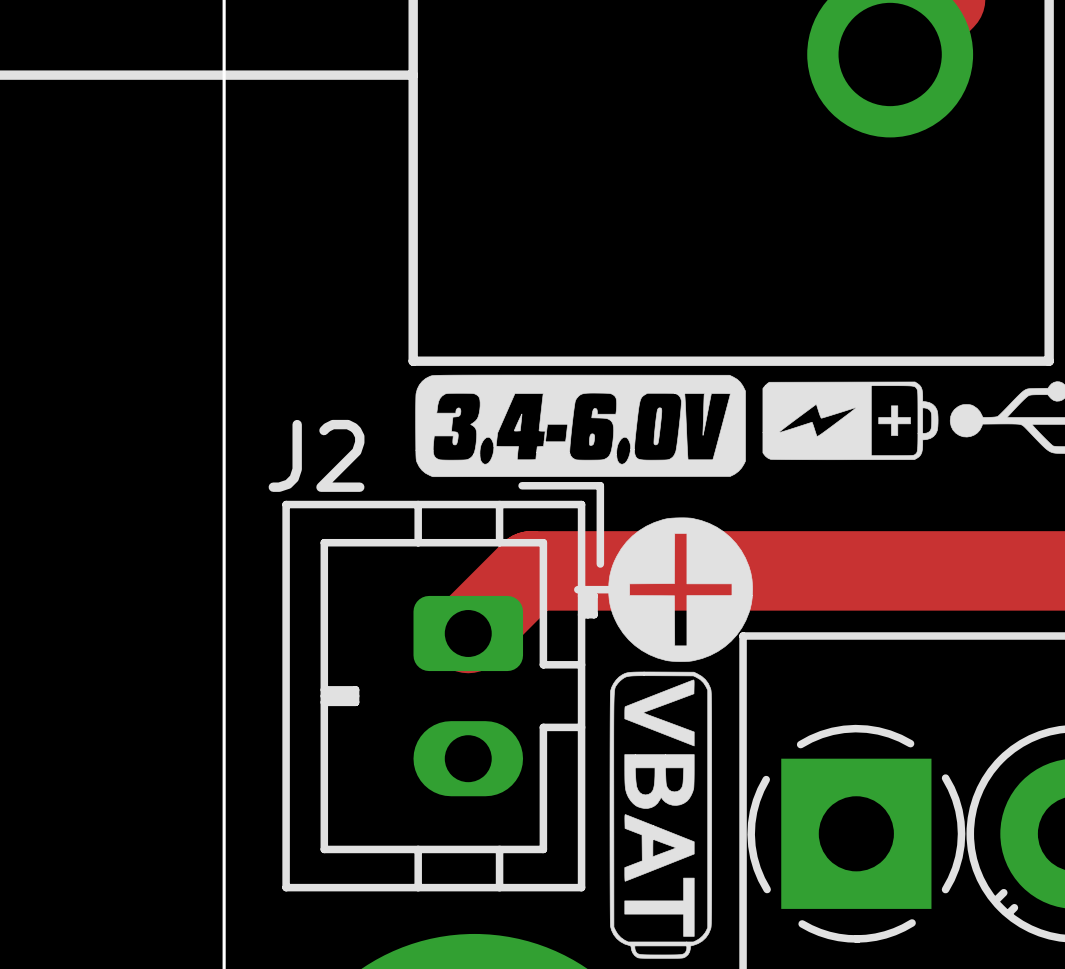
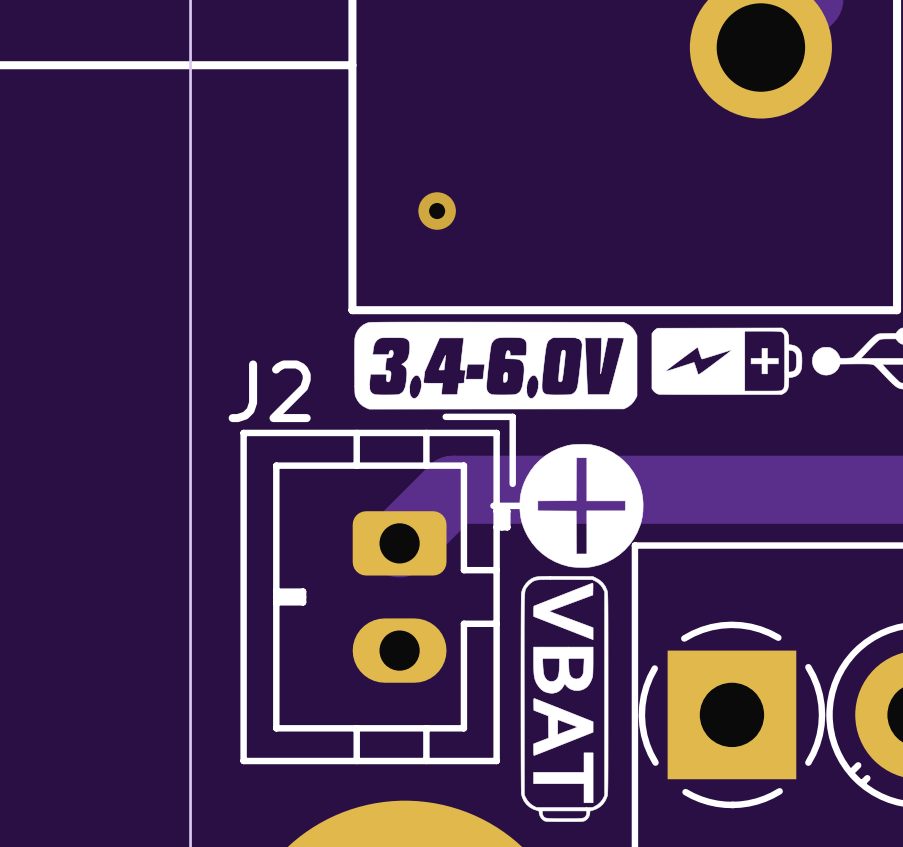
via: none -> (437, 211)

